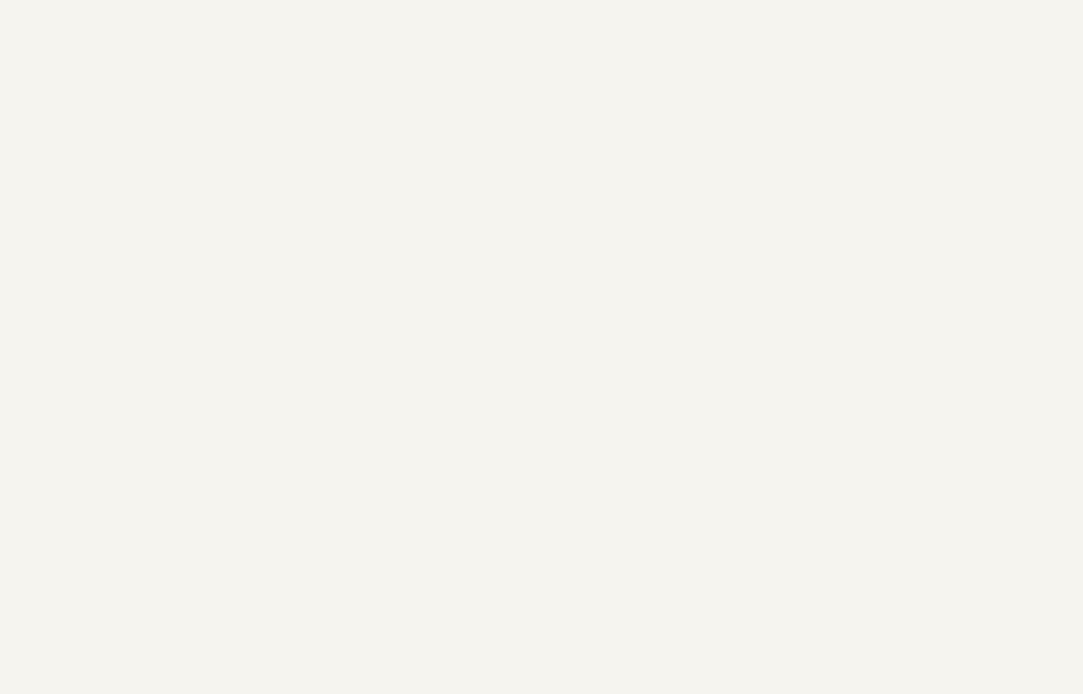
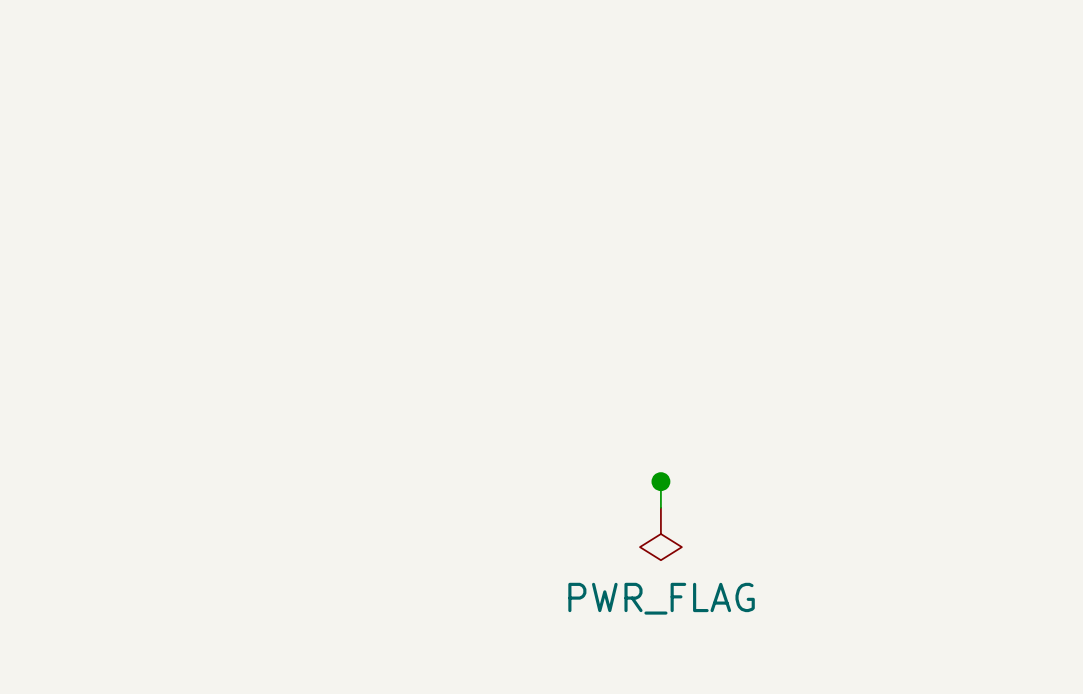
wire: none -> (660, 481) (660, 507)
junction: none -> (660, 481)
power symbol: none -> PWR_FLAG (660, 534)

